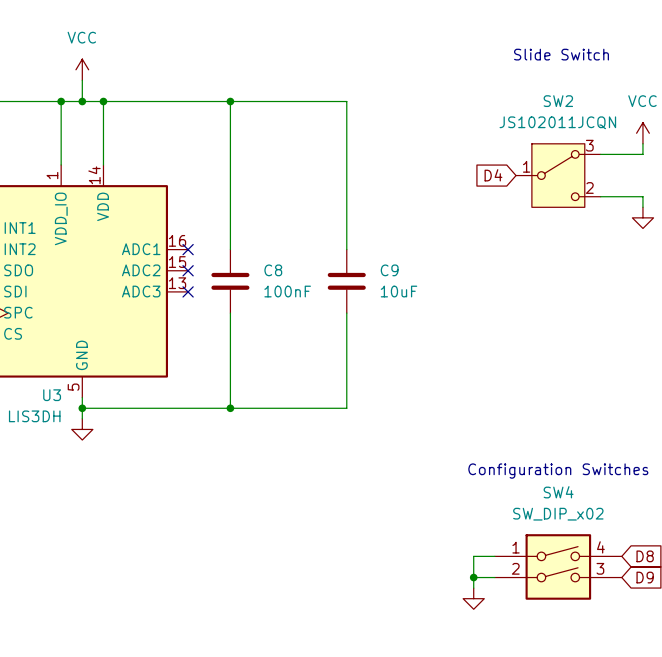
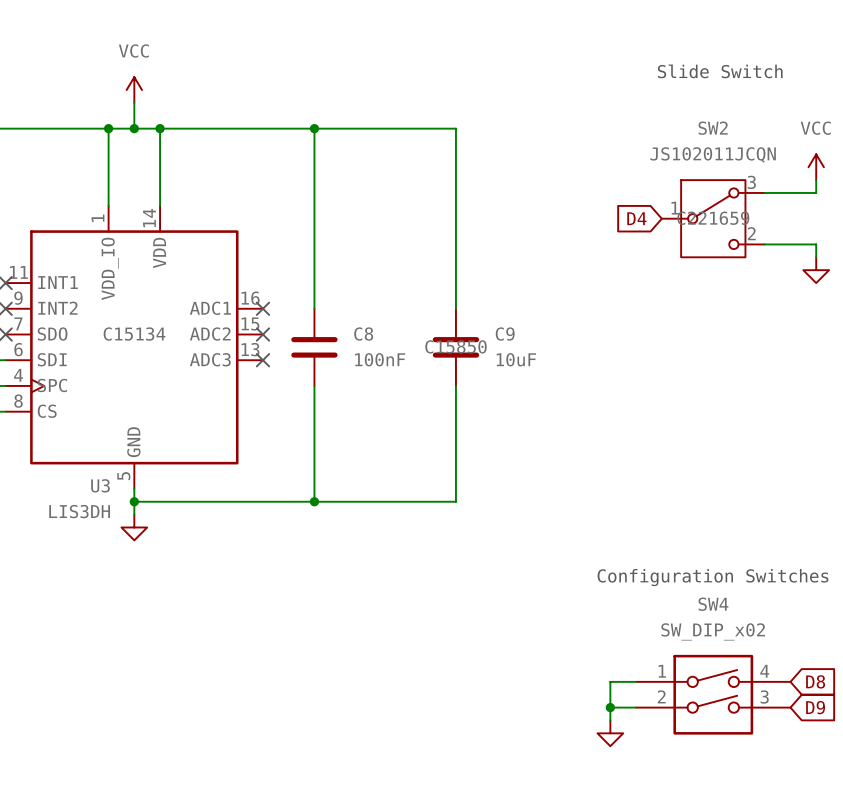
SW2 text: none -> C221659 (713, 218)
U3 text: none -> C15134 (134, 334)
C9 text: none -> C15850 (455, 346)

